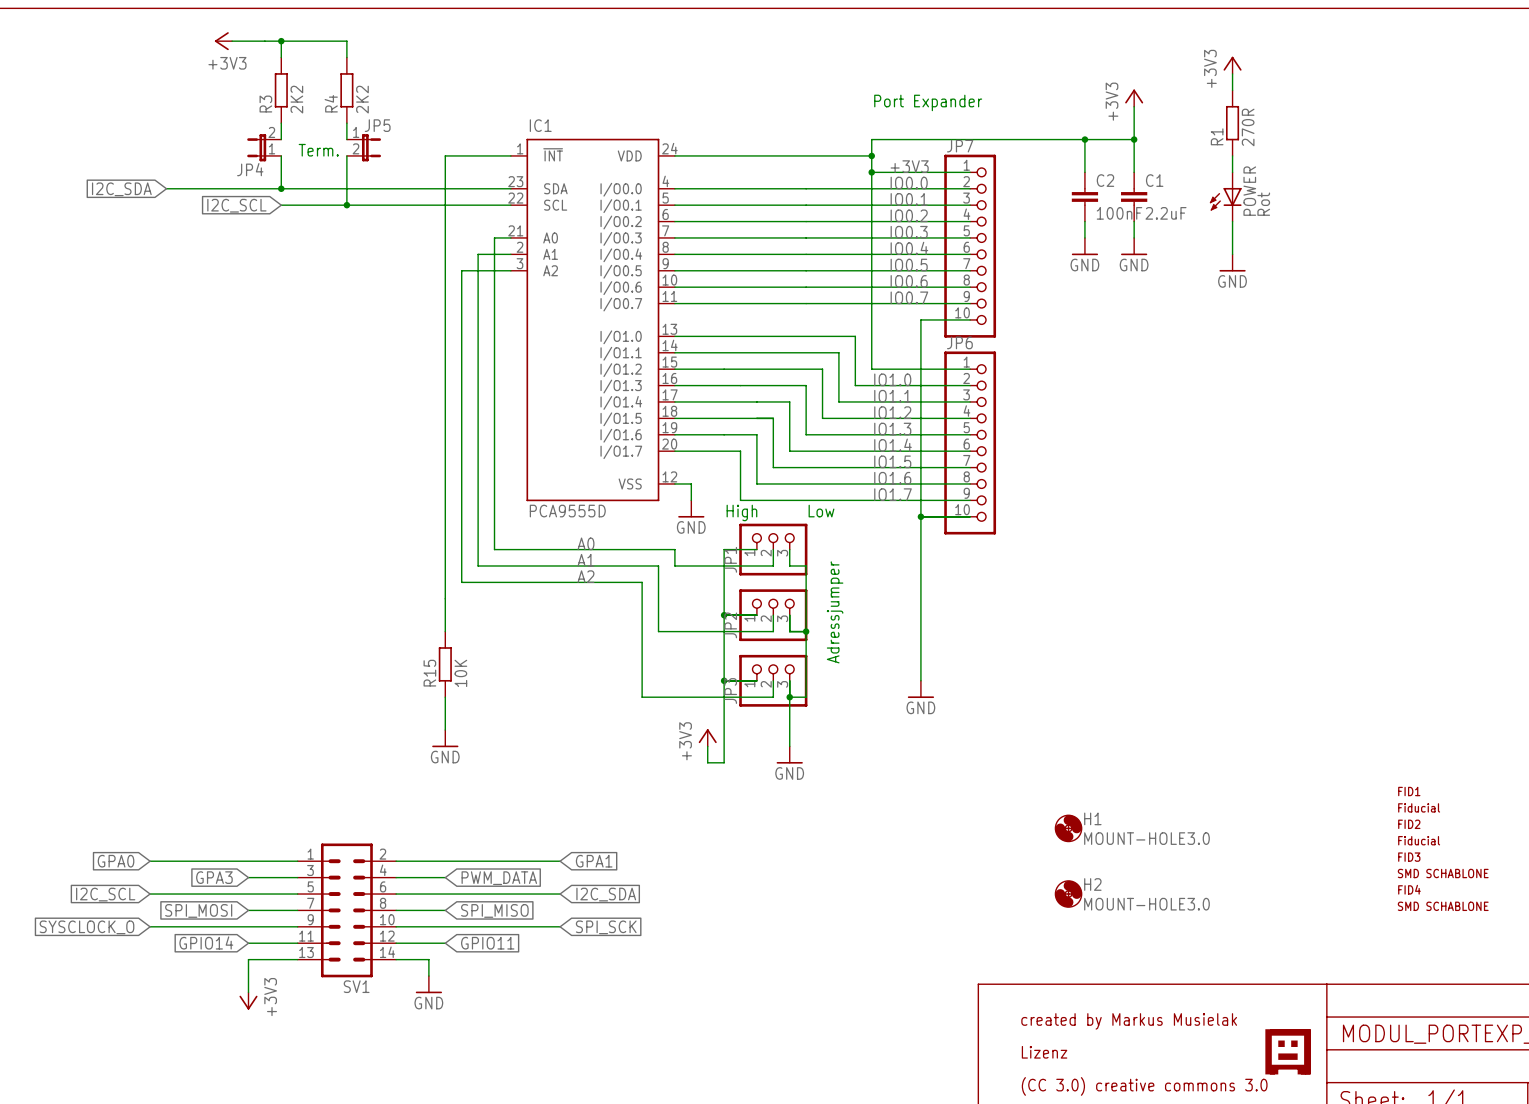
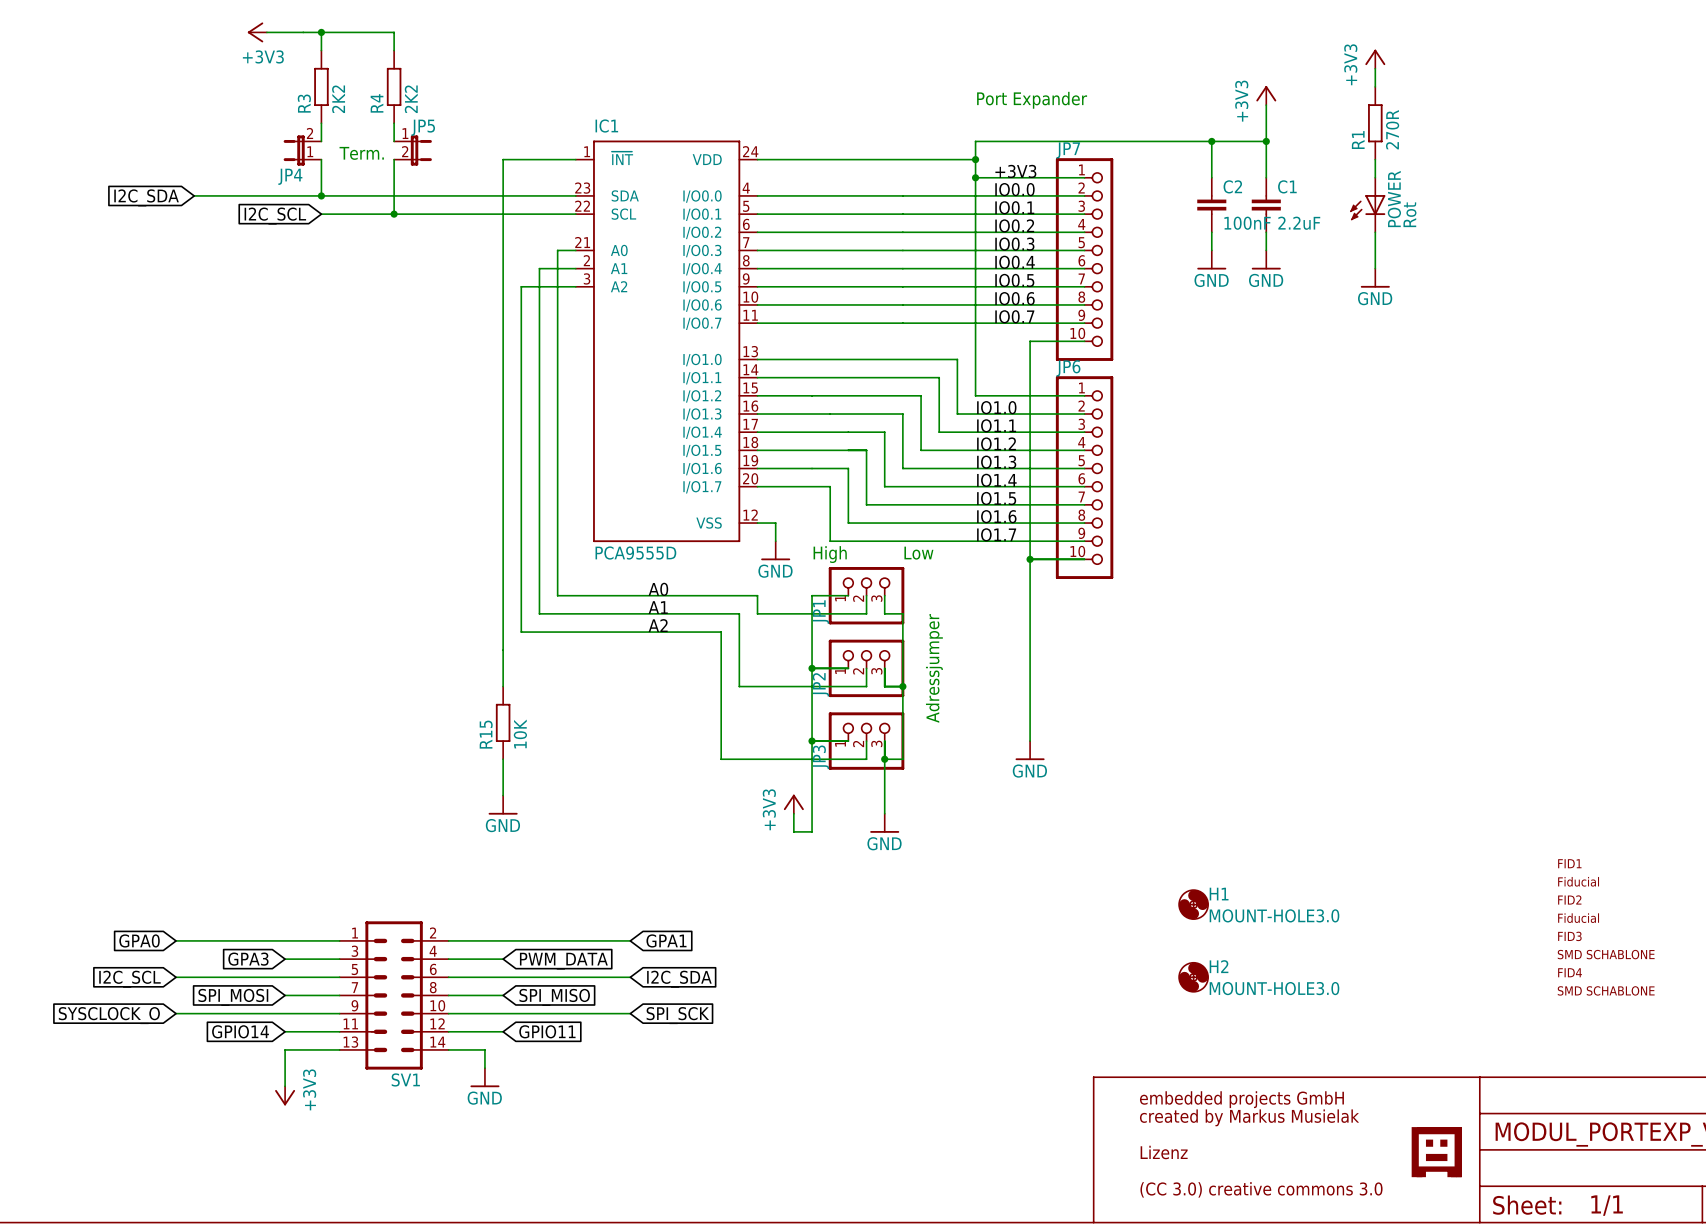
text: none -> embedded projects GmbH (1241, 1099)

